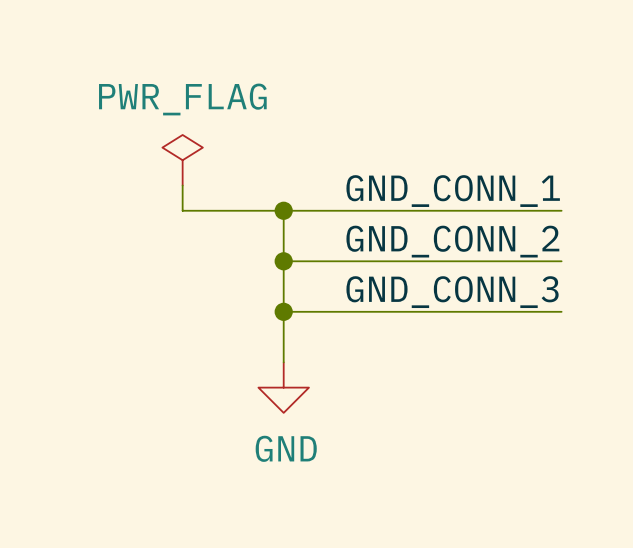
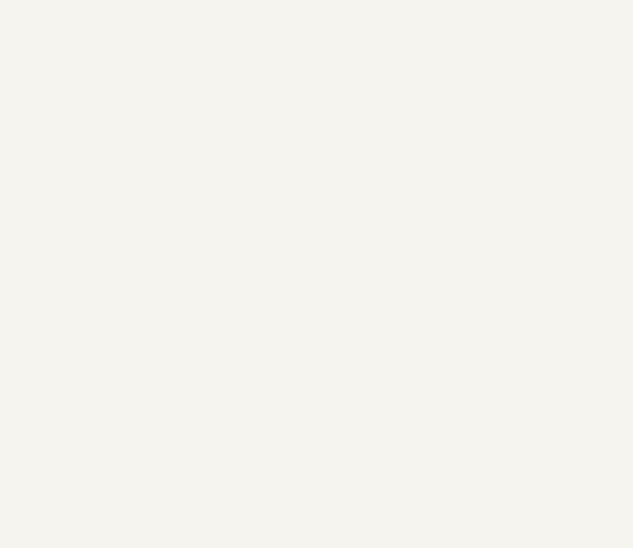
power symbol: PWR_FLAG (182, 160) -> none
wire: (182, 185) (182, 210) (561, 210) -> none
label: GND_CONN_1 (453, 191) -> none
wire: (283, 210) (283, 362) -> none
junction: (283, 210) -> none
label: GND_CONN_2 (452, 241) -> none
wire: (283, 261) (561, 261) -> none
junction: (283, 261) -> none
label: GND_CONN_3 (452, 292) -> none
wire: (283, 311) (561, 311) -> none
junction: (283, 311) -> none
power symbol: GND (283, 387) -> none

